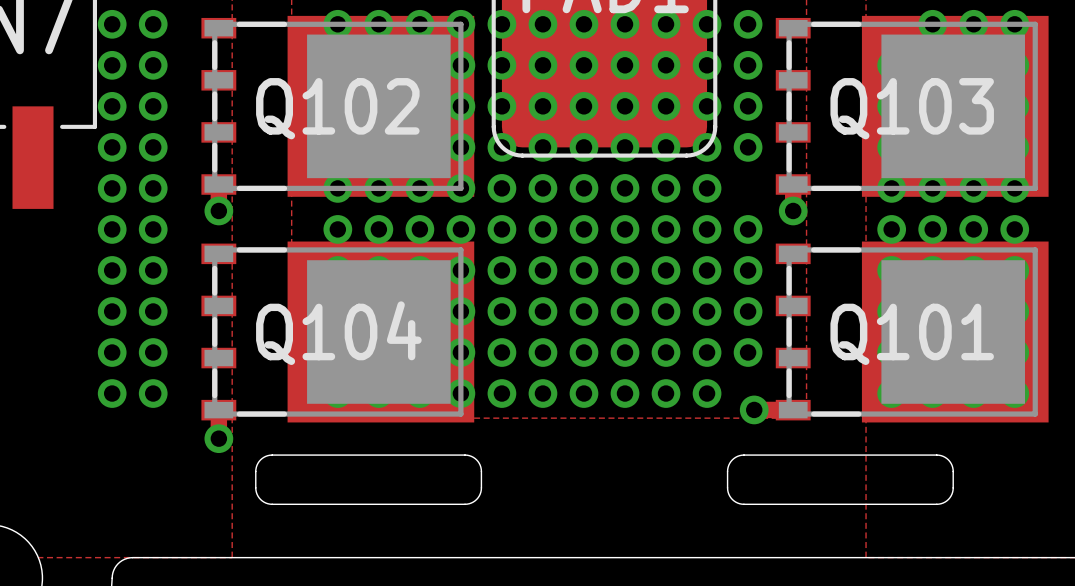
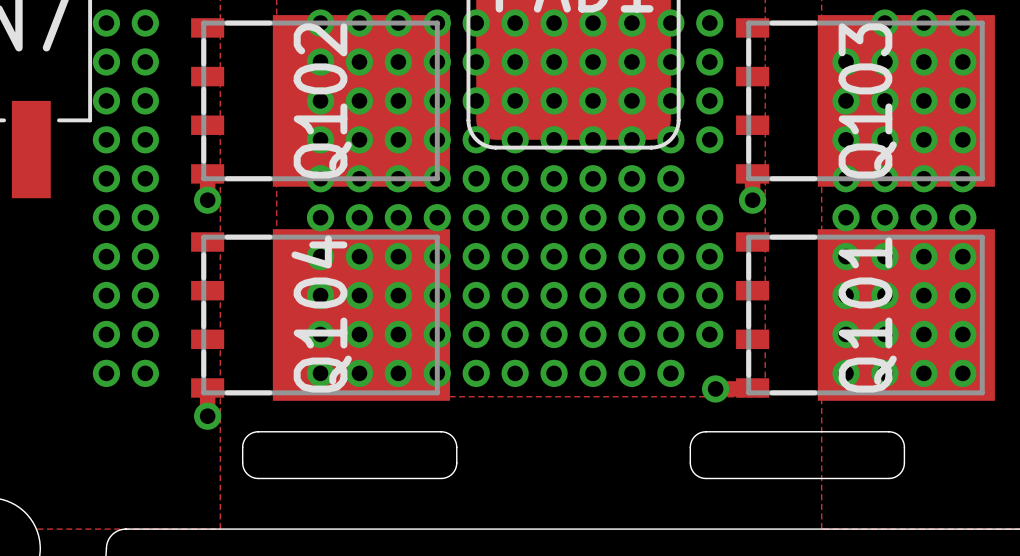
Q102 footprint: [201, 15, 475, 197] -> [191, 15, 450, 187]
Q103 footprint: [775, 15, 1049, 197] -> [736, 15, 995, 187]
Q104 footprint: [201, 241, 475, 423] -> [191, 229, 450, 401]
Q101 footprint: [775, 241, 1049, 423] -> [736, 229, 995, 401]

